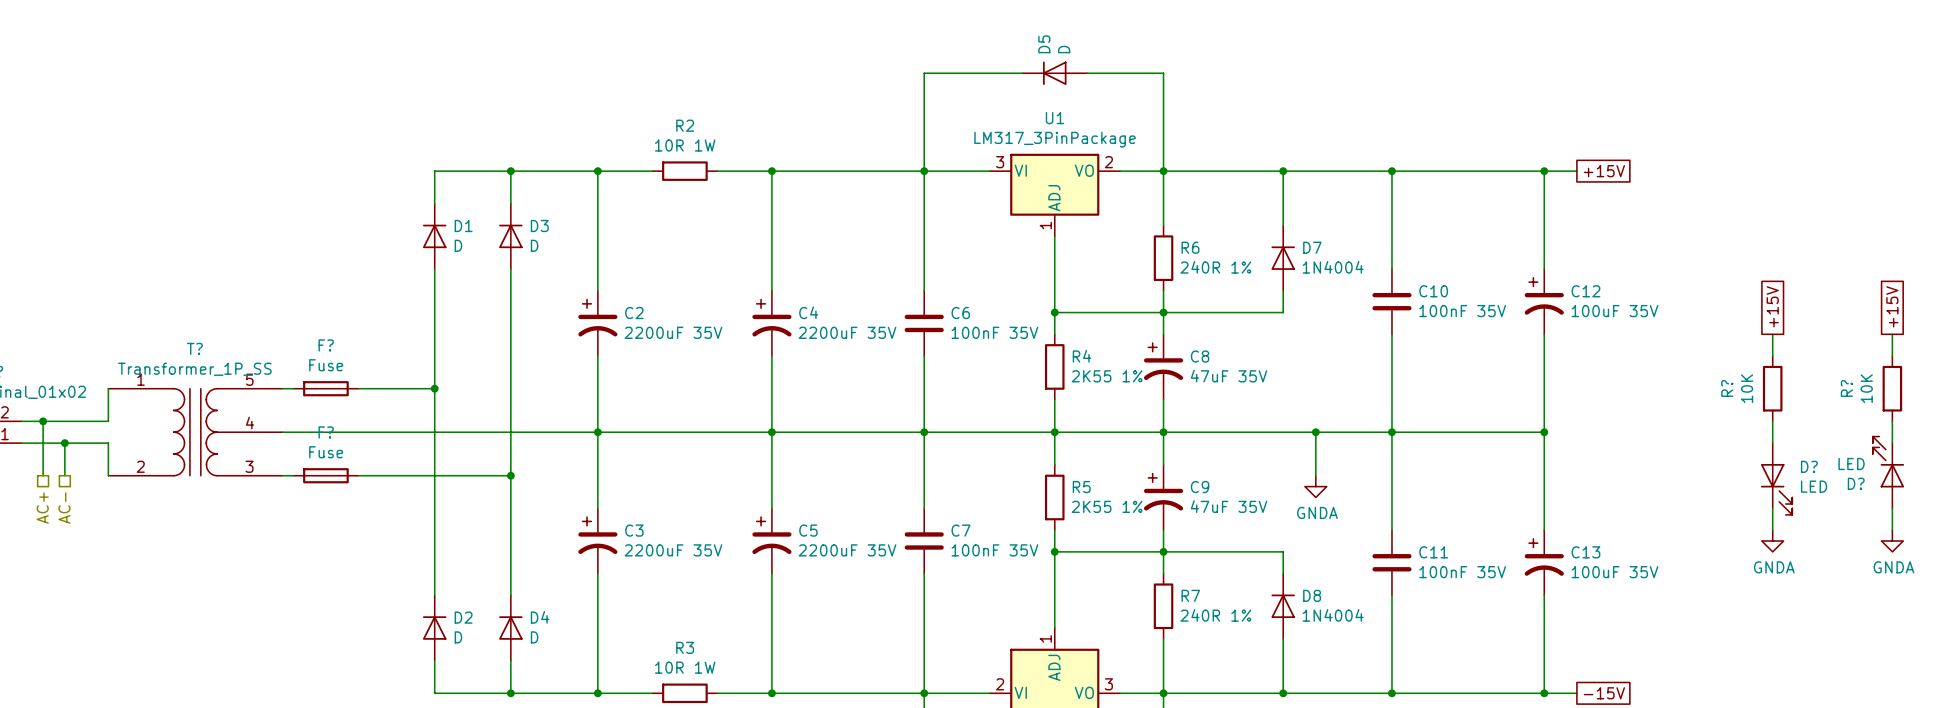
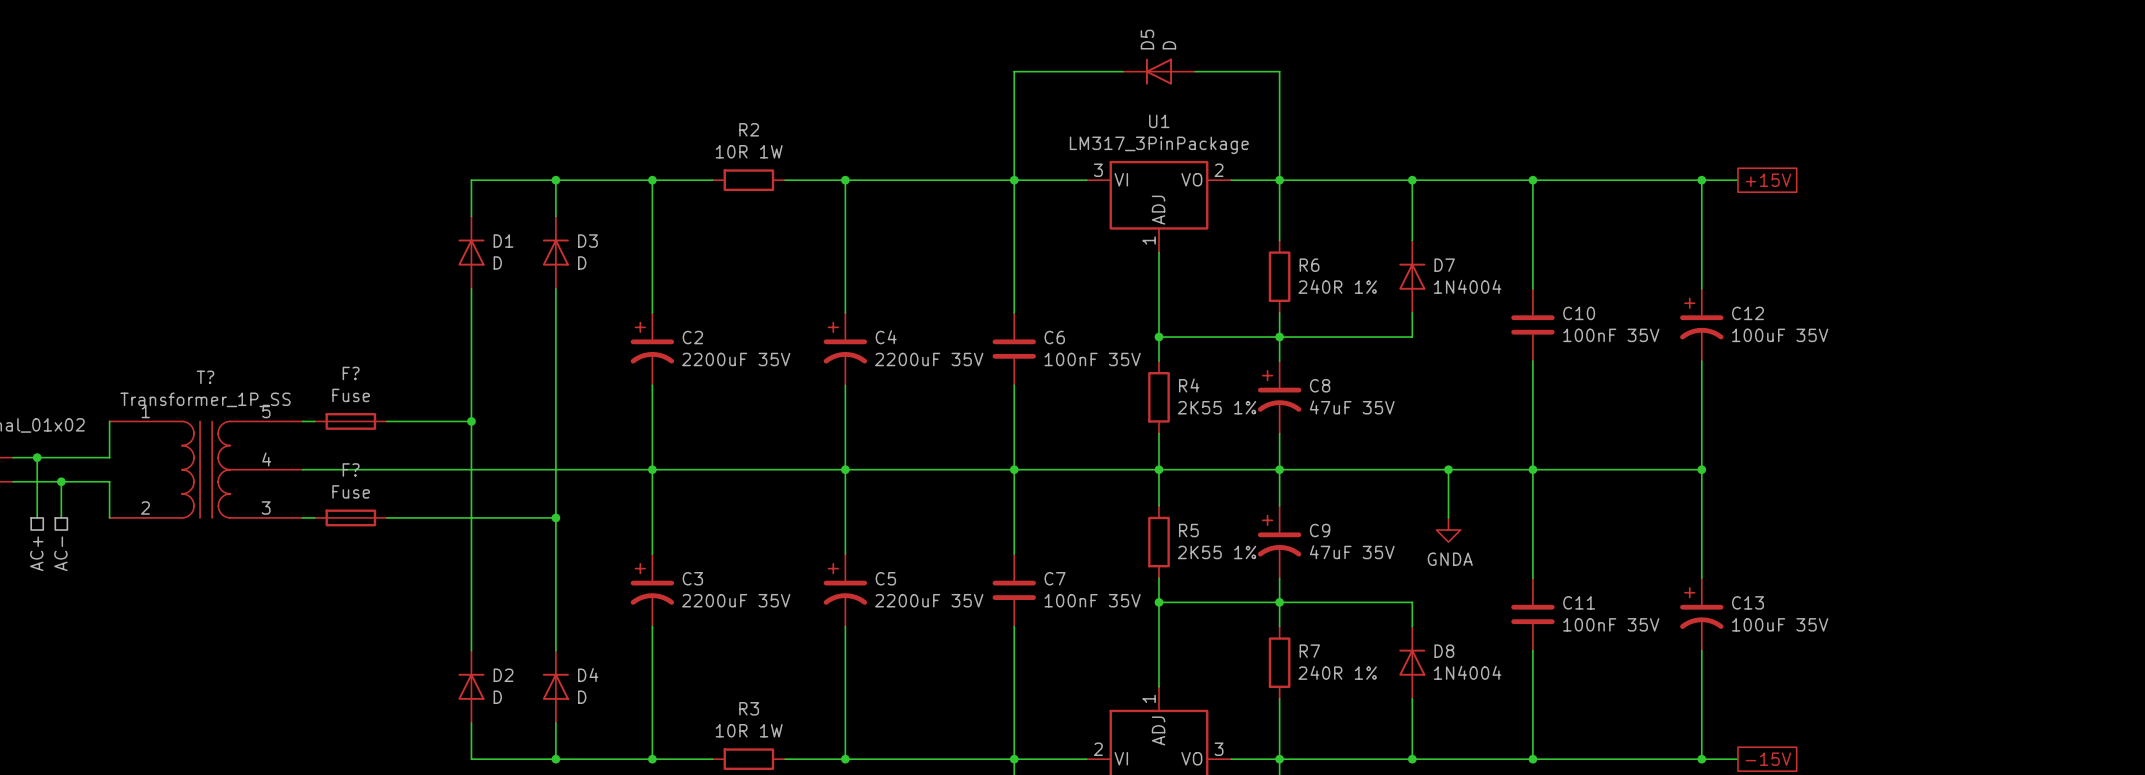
global label: +15V (1772, 306) -> none
global label: +15V (1892, 306) -> none
wire: (1772, 334) (1772, 356) -> none
wire: (1892, 334) (1892, 356) -> none
R?: 10K (1772, 388) -> none
R?: 10K (1892, 388) -> none
wire: (1772, 421) (1772, 443) -> none
wire: (1892, 421) (1892, 443) -> none
D?: LED (1888, 472) -> none
D?: LED (1776, 478) -> none
wire: (1772, 508) (1772, 530) -> none
wire: (1892, 508) (1892, 530) -> none
power symbol: GNDA (1772, 541) -> none
power symbol: GNDA (1892, 541) -> none

